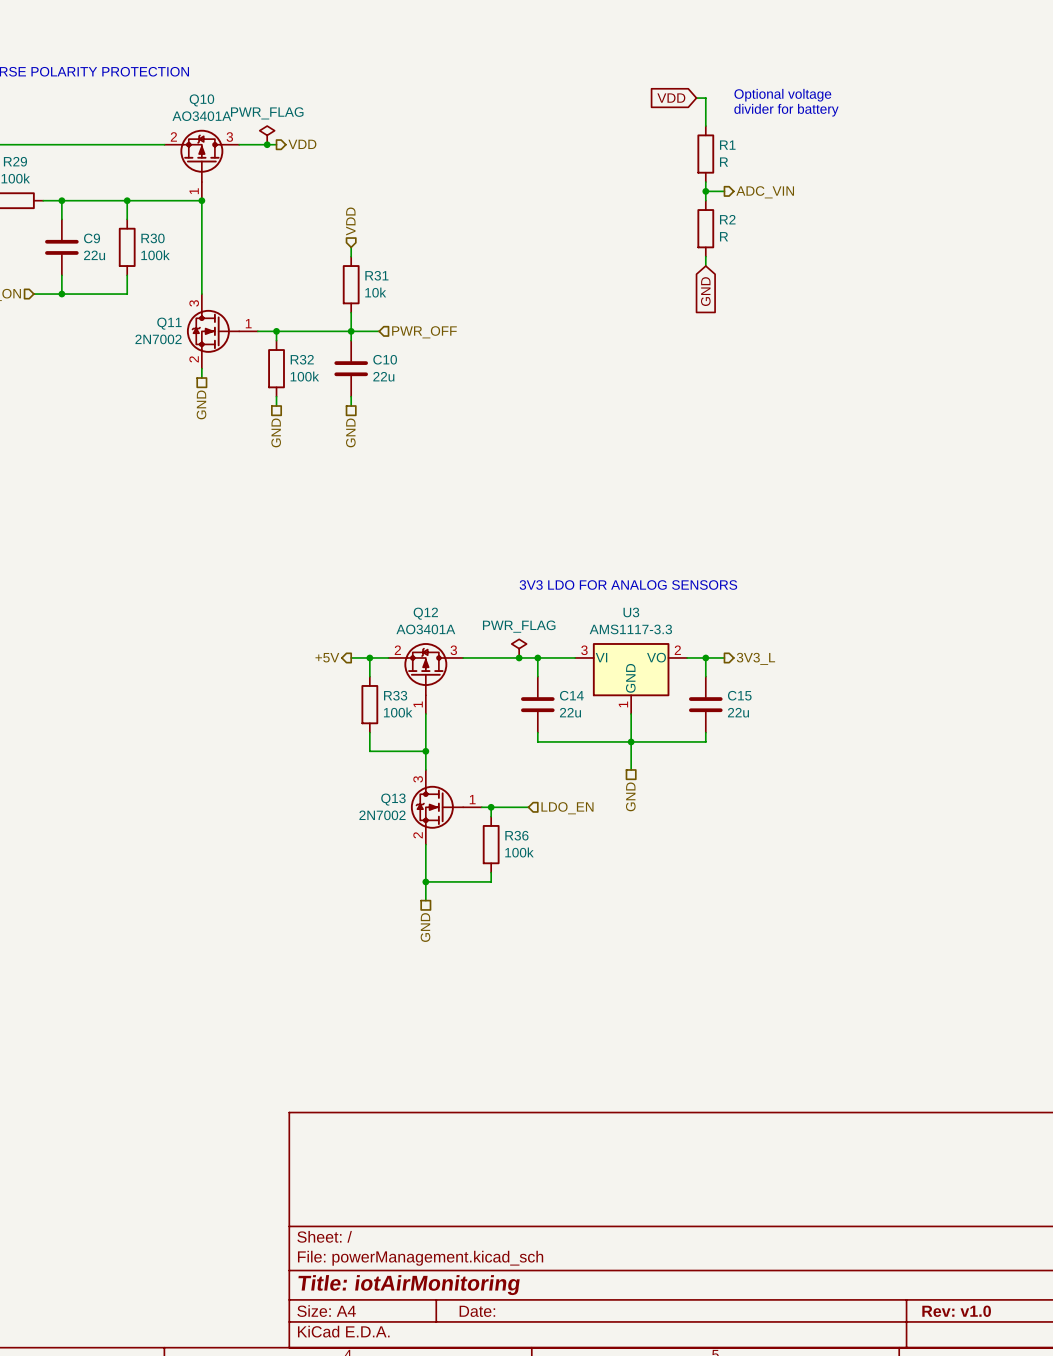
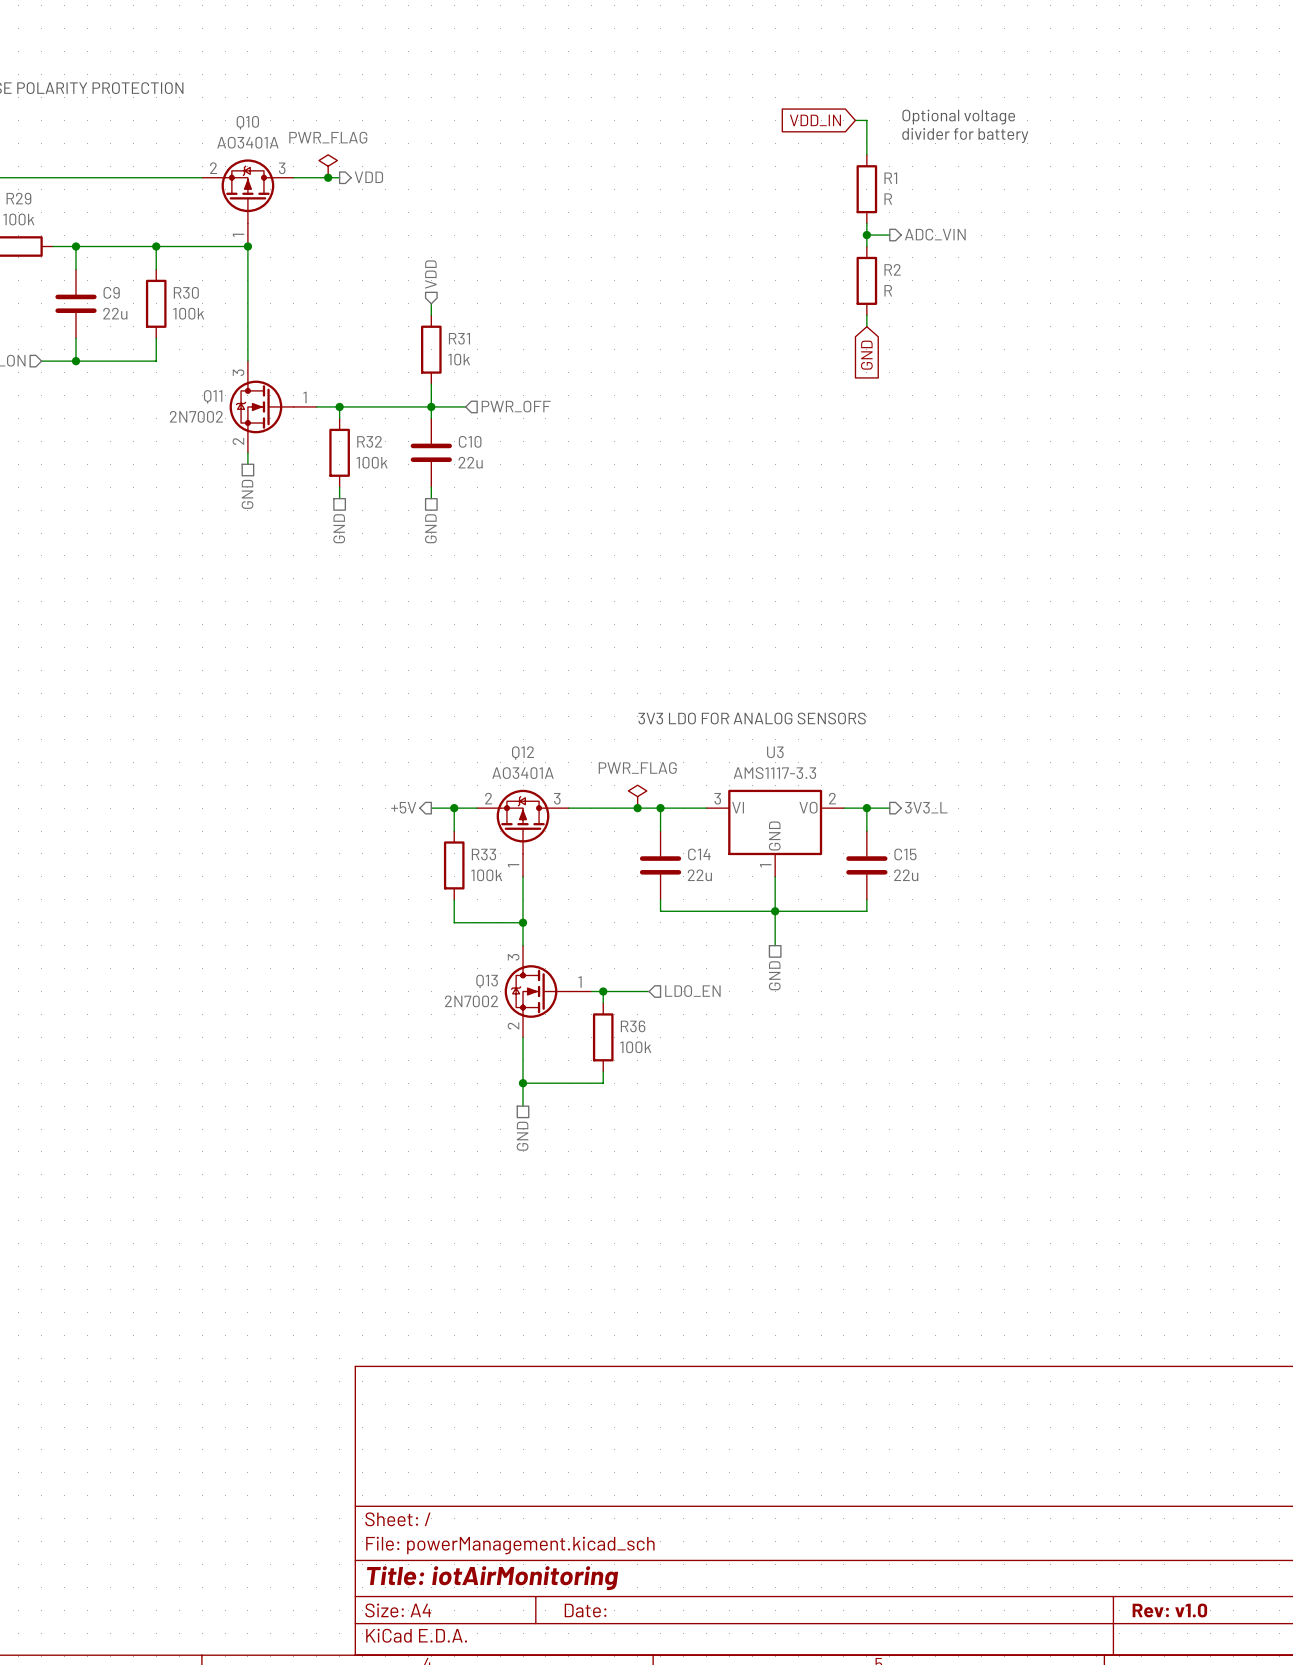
global label: VDD (671, 98) -> VDD_IN (815, 120)

